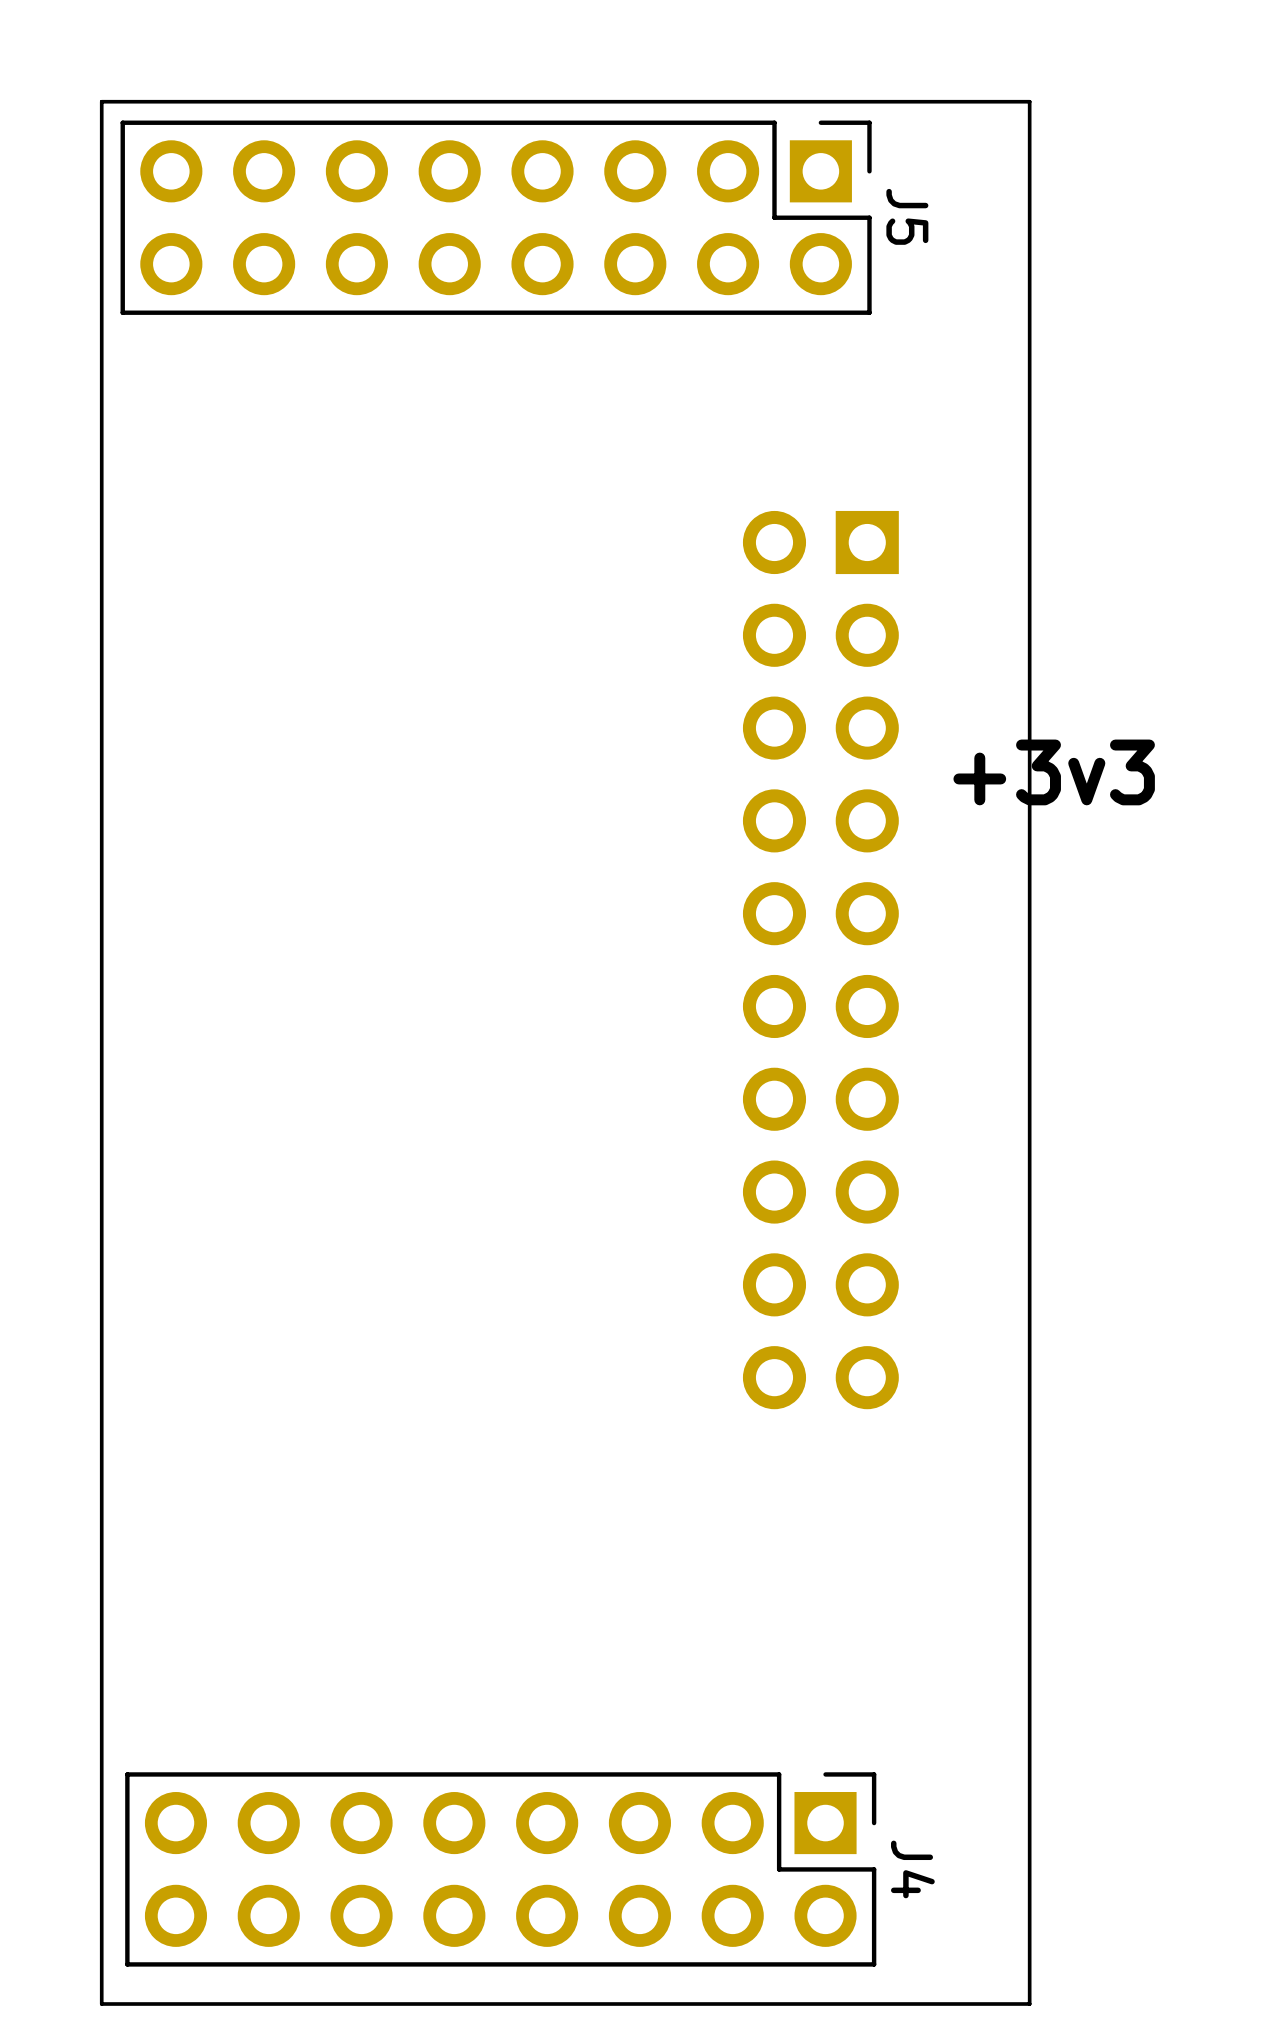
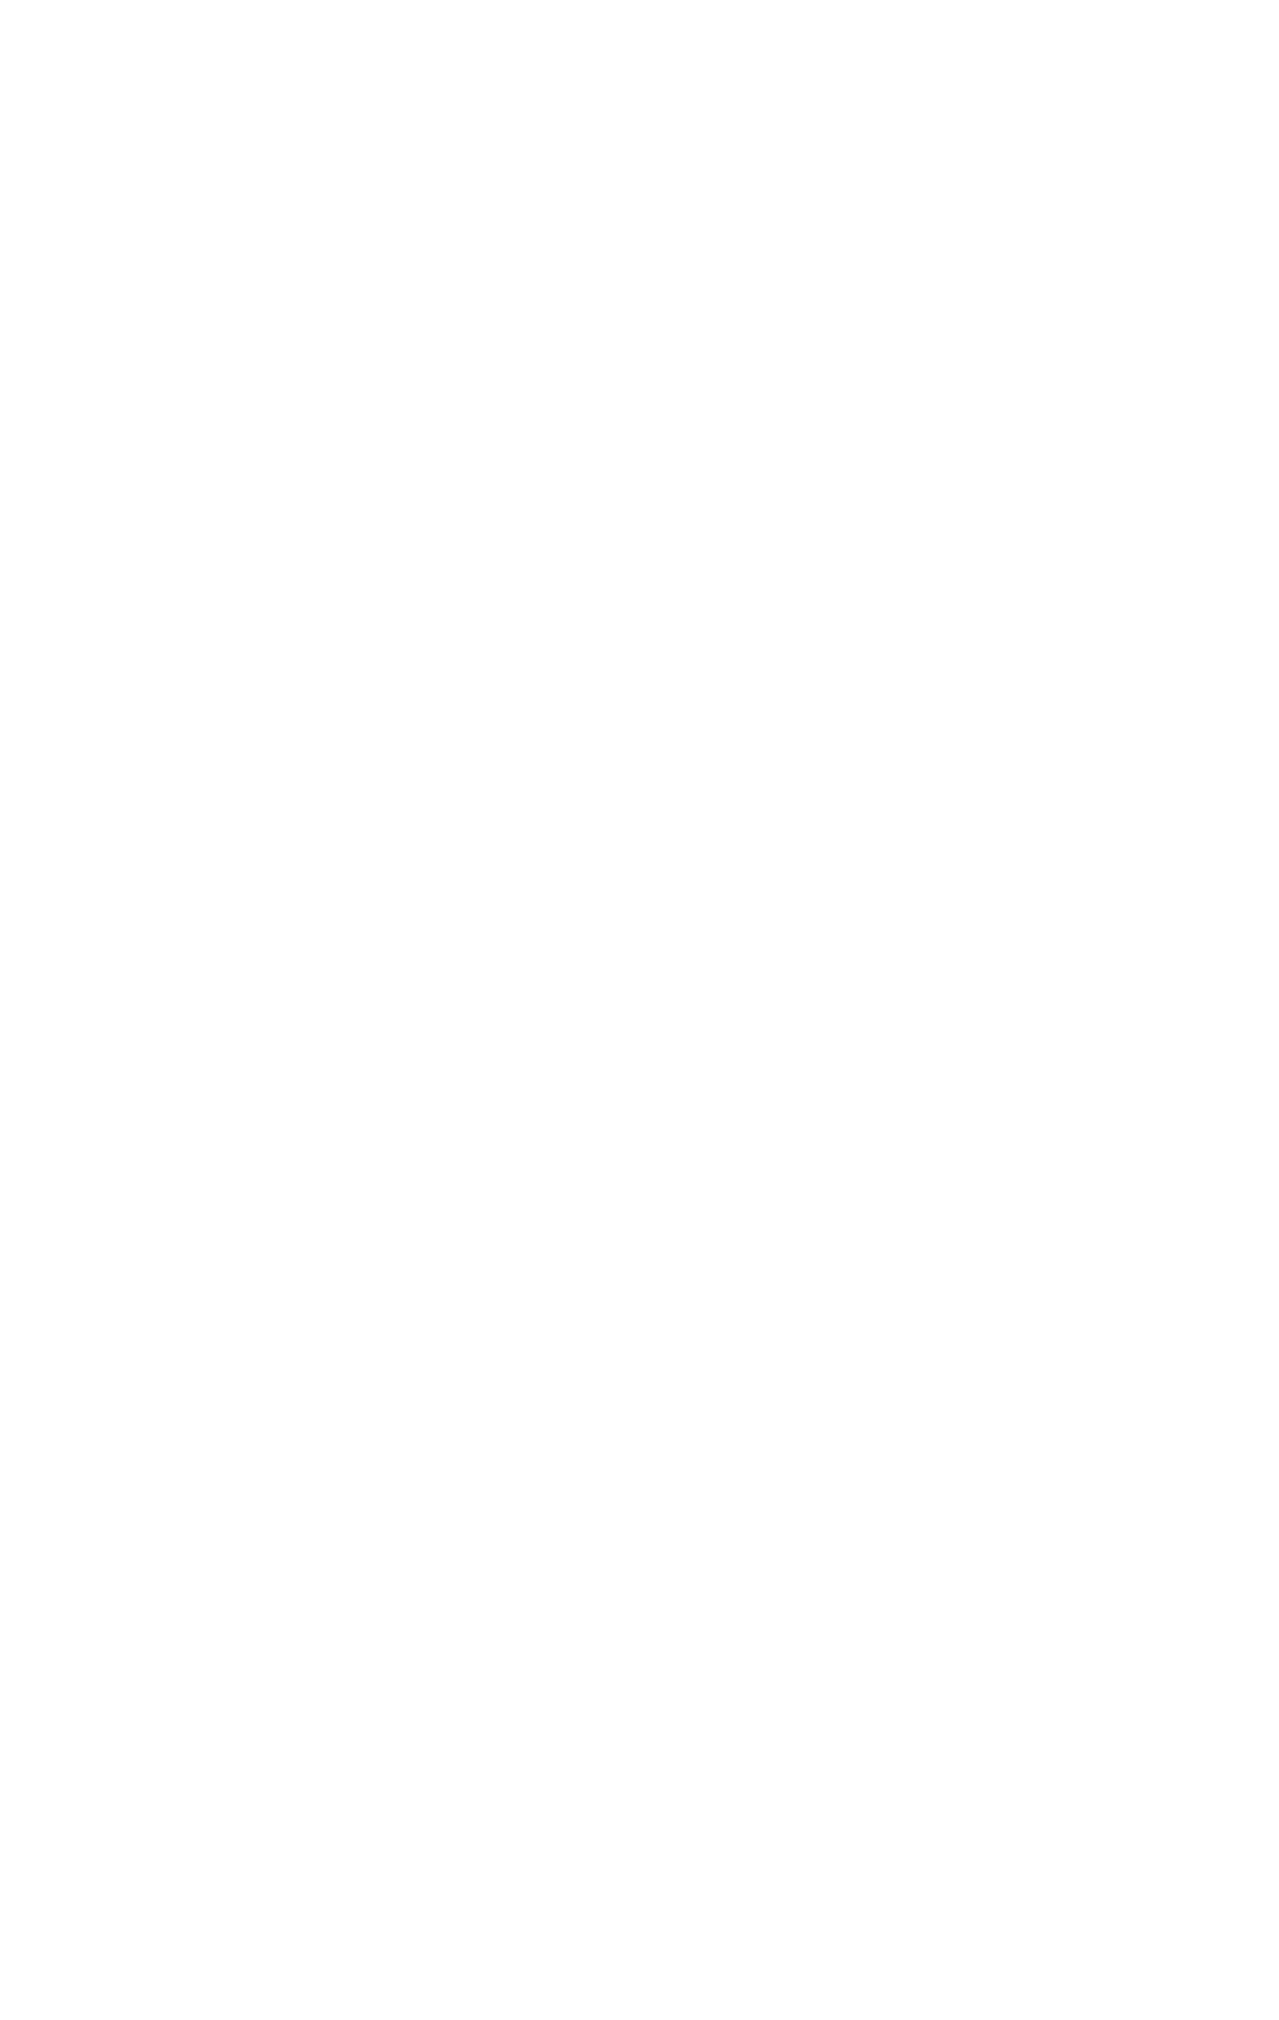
board edge: (1029, 101) (1029, 2004) (101, 2004) (101, 101) (1029, 101) -> none
J5: (496, 217) -> none
text: +3v3 (1054, 772) -> none
part: (820, 960) -> none
J4: (500, 1869) -> none

